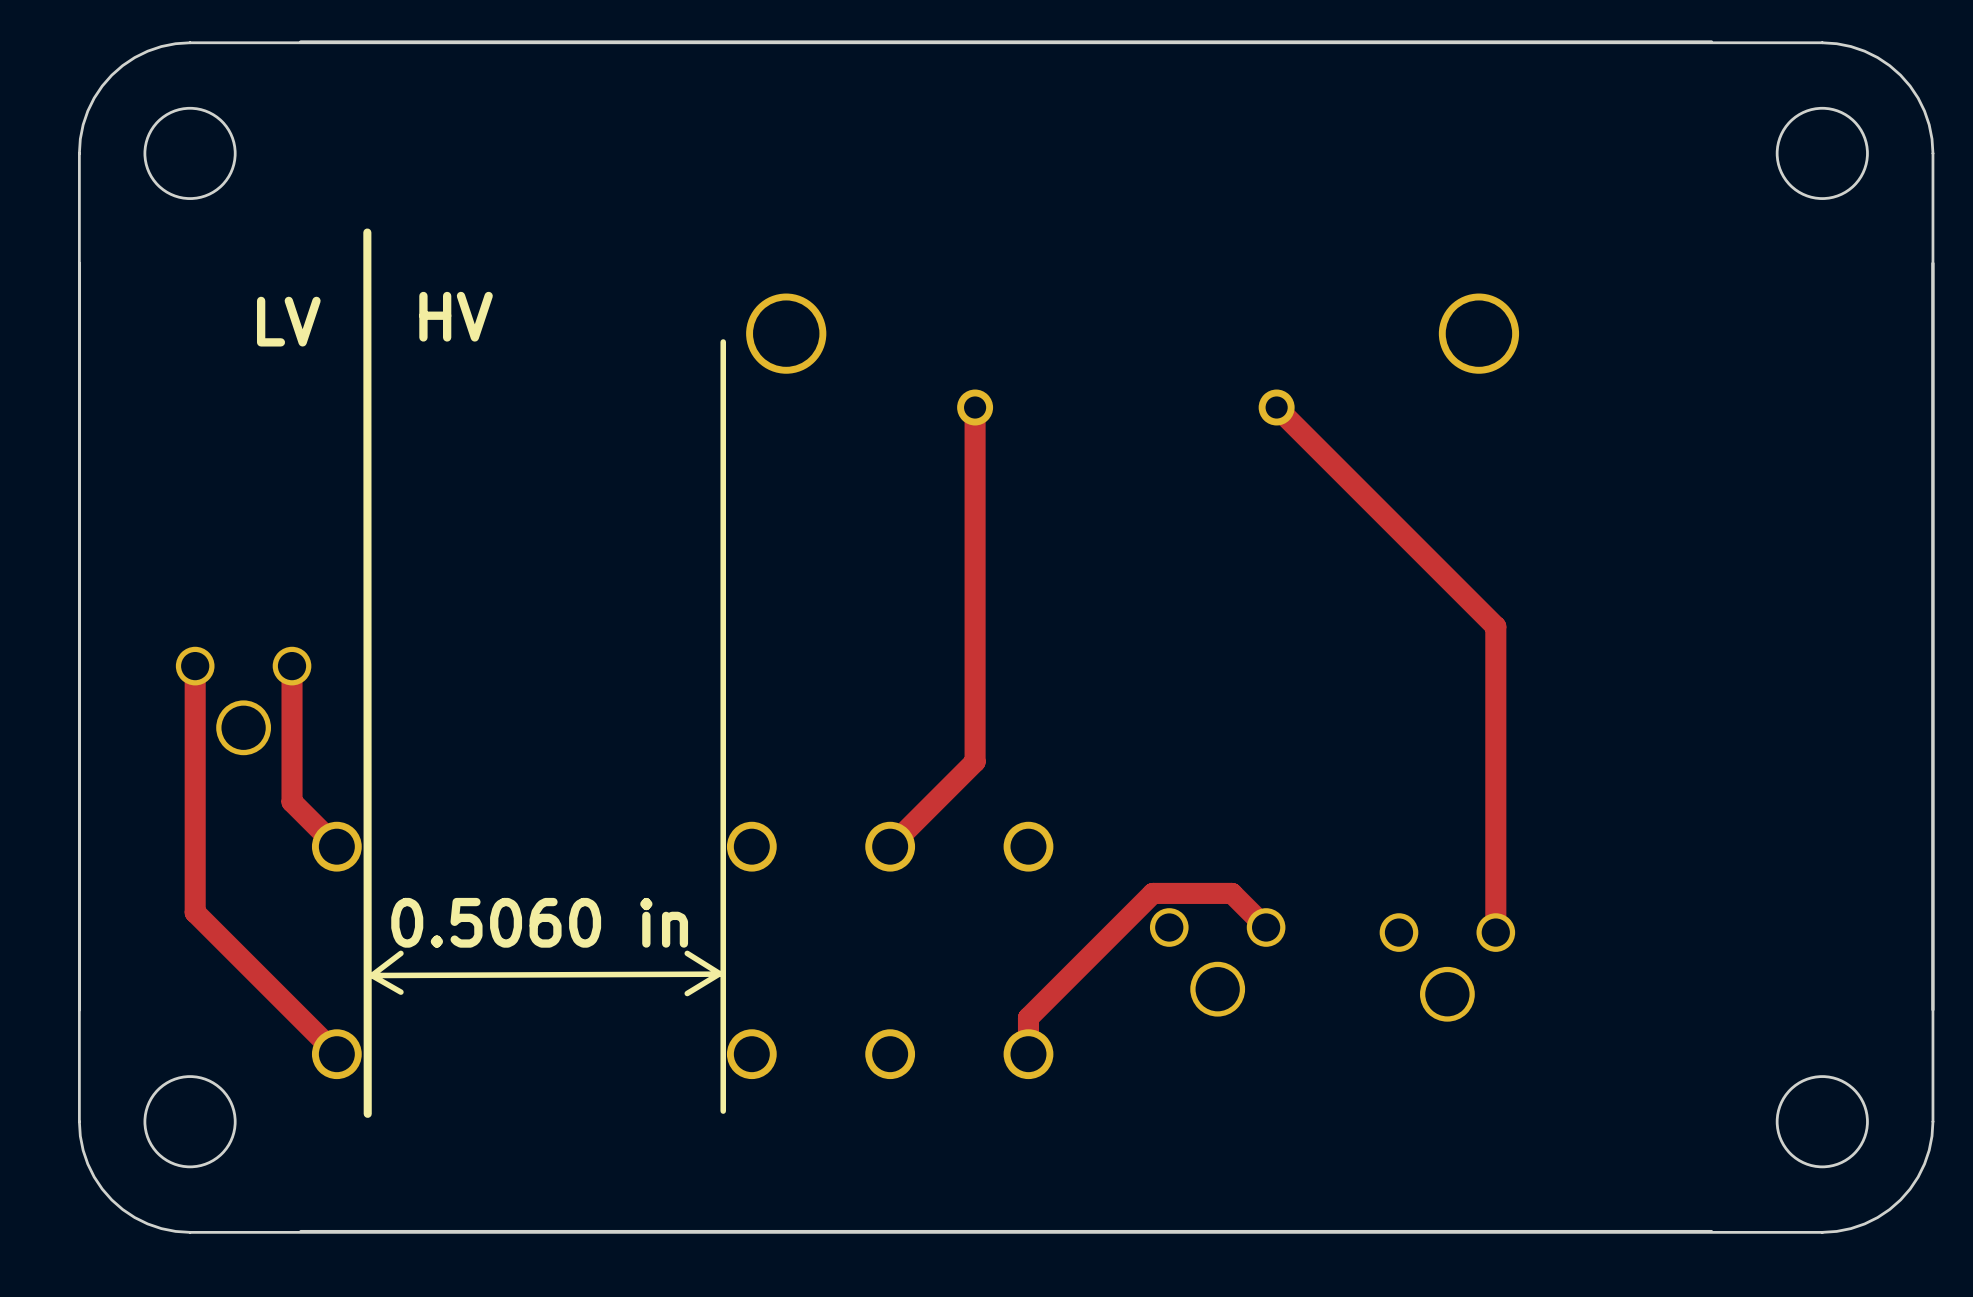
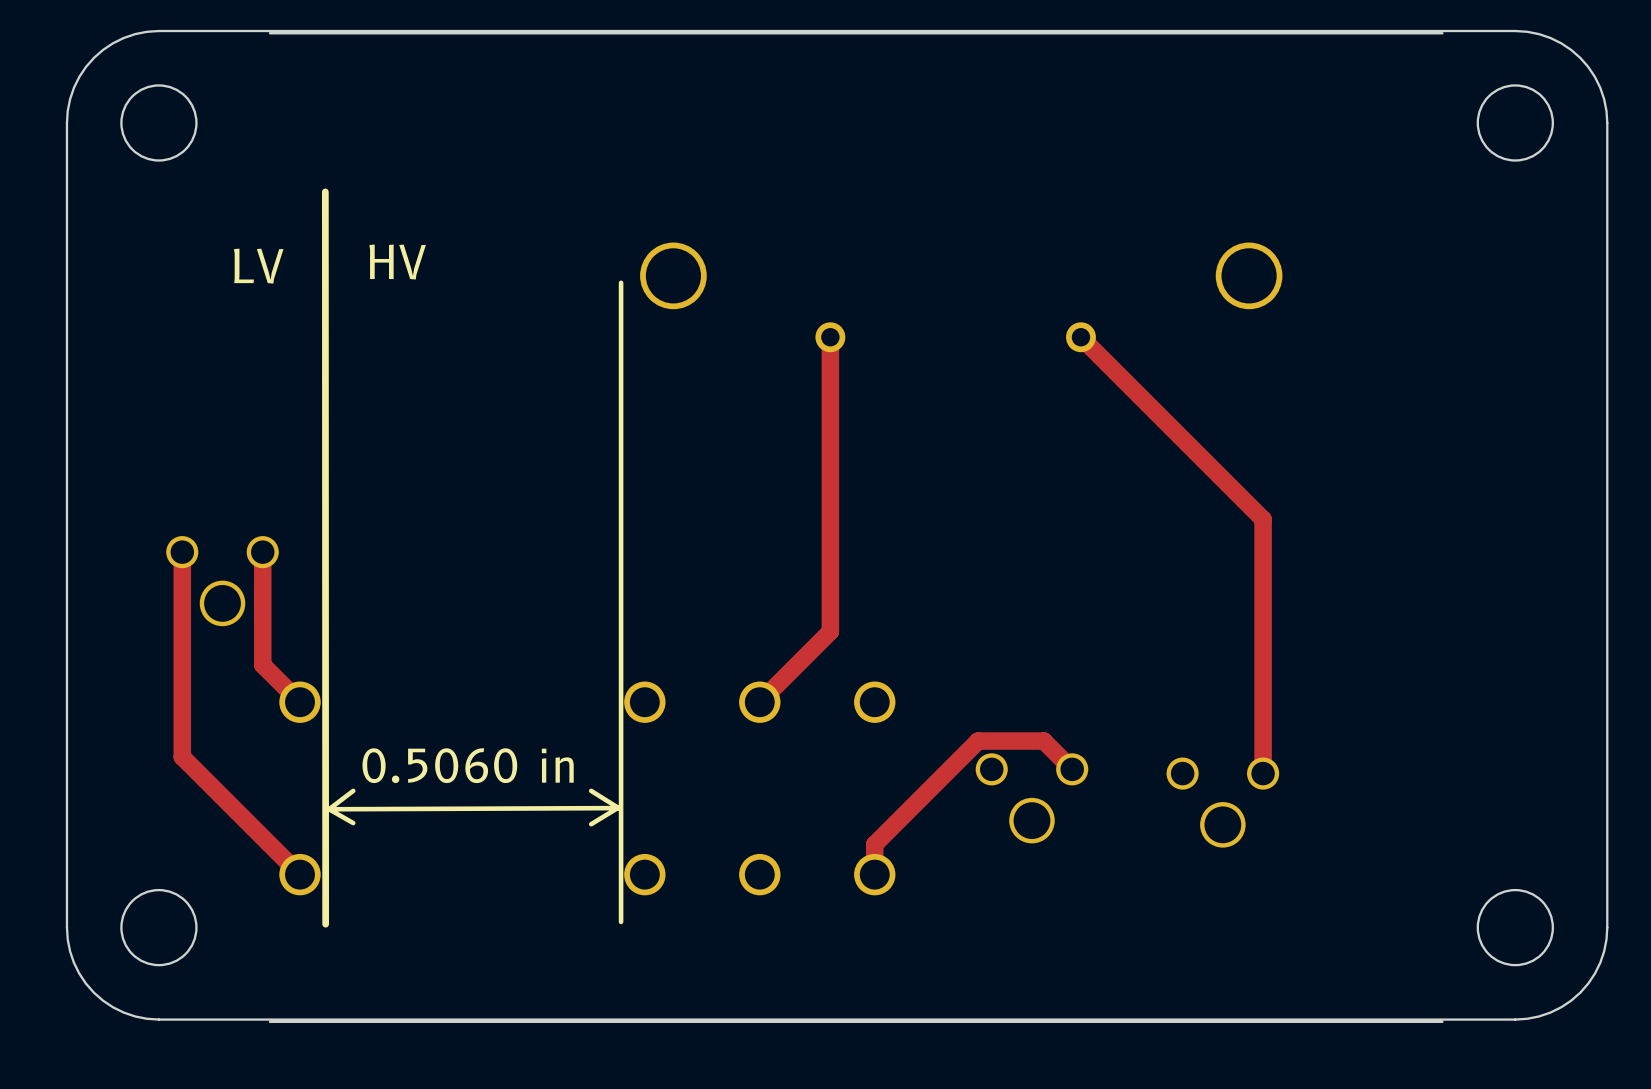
board edge: (1822, 42) (190, 42) (161, 46) (134, 57) (111, 75) (94, 98) (83, 124) (79, 153) (79, 1121) (83, 1150) (94, 1177) (111, 1199) (134, 1217) (161, 1228) (190, 1232) (1822, 1232) (1850, 1228) (1877, 1217) (1900, 1199) (1918, 1177) (1929, 1150) (1932, 1121) (1932, 153) (1929, 124) (1924, 111) (1910, 86) (1900, 75) (1889, 65) (1864, 51) (1850, 46) (1822, 42) -> (1515, 31) (158, 31) (135, 34) (112, 43) (93, 57) (79, 76) (70, 99) (66, 122) (66, 927) (70, 951) (79, 973) (93, 992) (112, 1007) (135, 1016) (158, 1019) (1515, 1019) (1539, 1016) (1561, 1007) (1580, 992) (1594, 973) (1604, 951) (1607, 927) (1607, 122) (1604, 99) (1600, 87) (1588, 66) (1580, 57) (1571, 50) (1550, 38) (1539, 34) (1515, 31)
round board edge position: (190, 153) -> (158, 122)
round board edge position: (1822, 153) -> (1515, 122)
round board edge position: (190, 1121) -> (158, 927)
round board edge position: (1822, 1121) -> (1515, 927)

